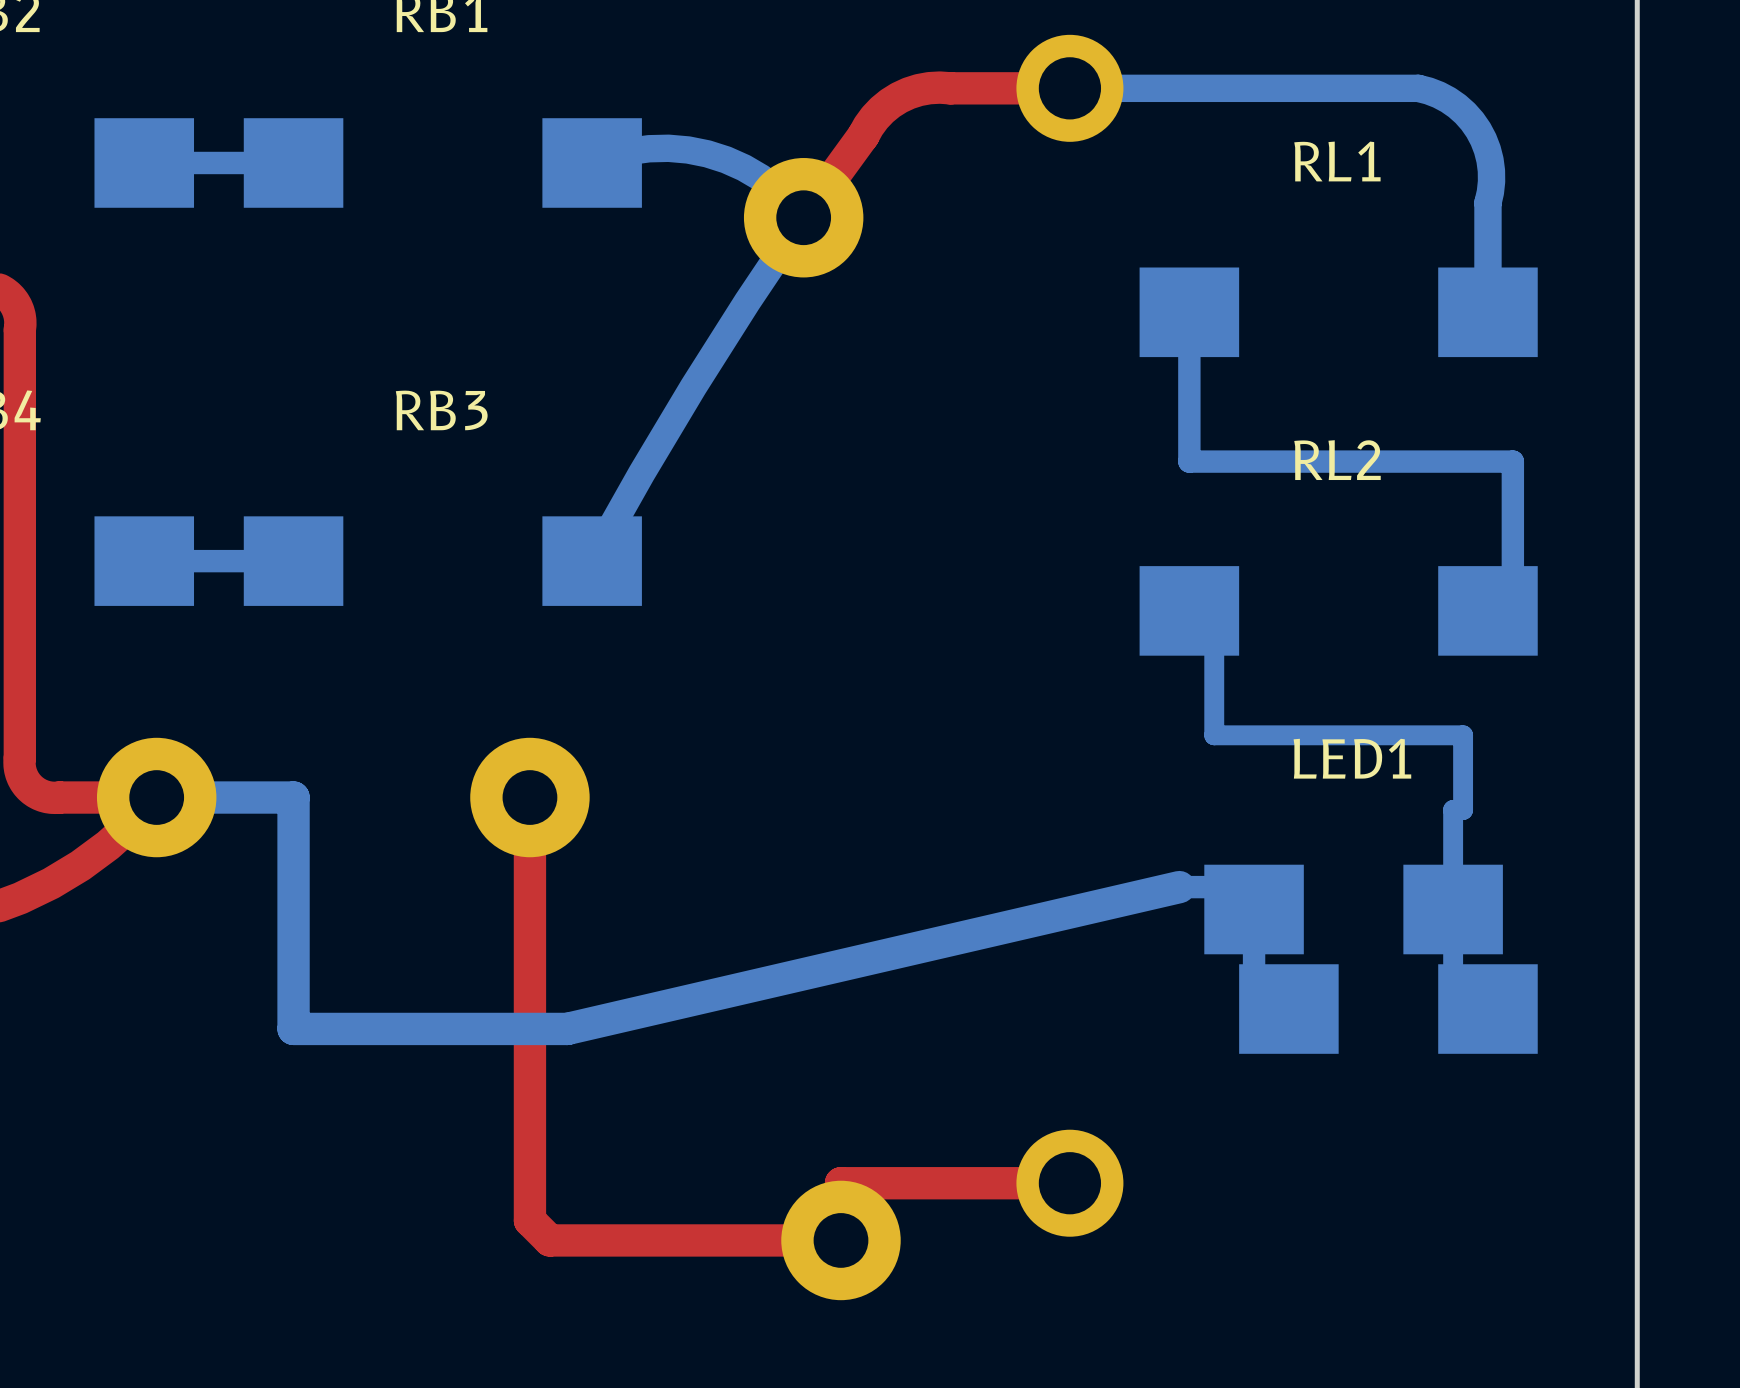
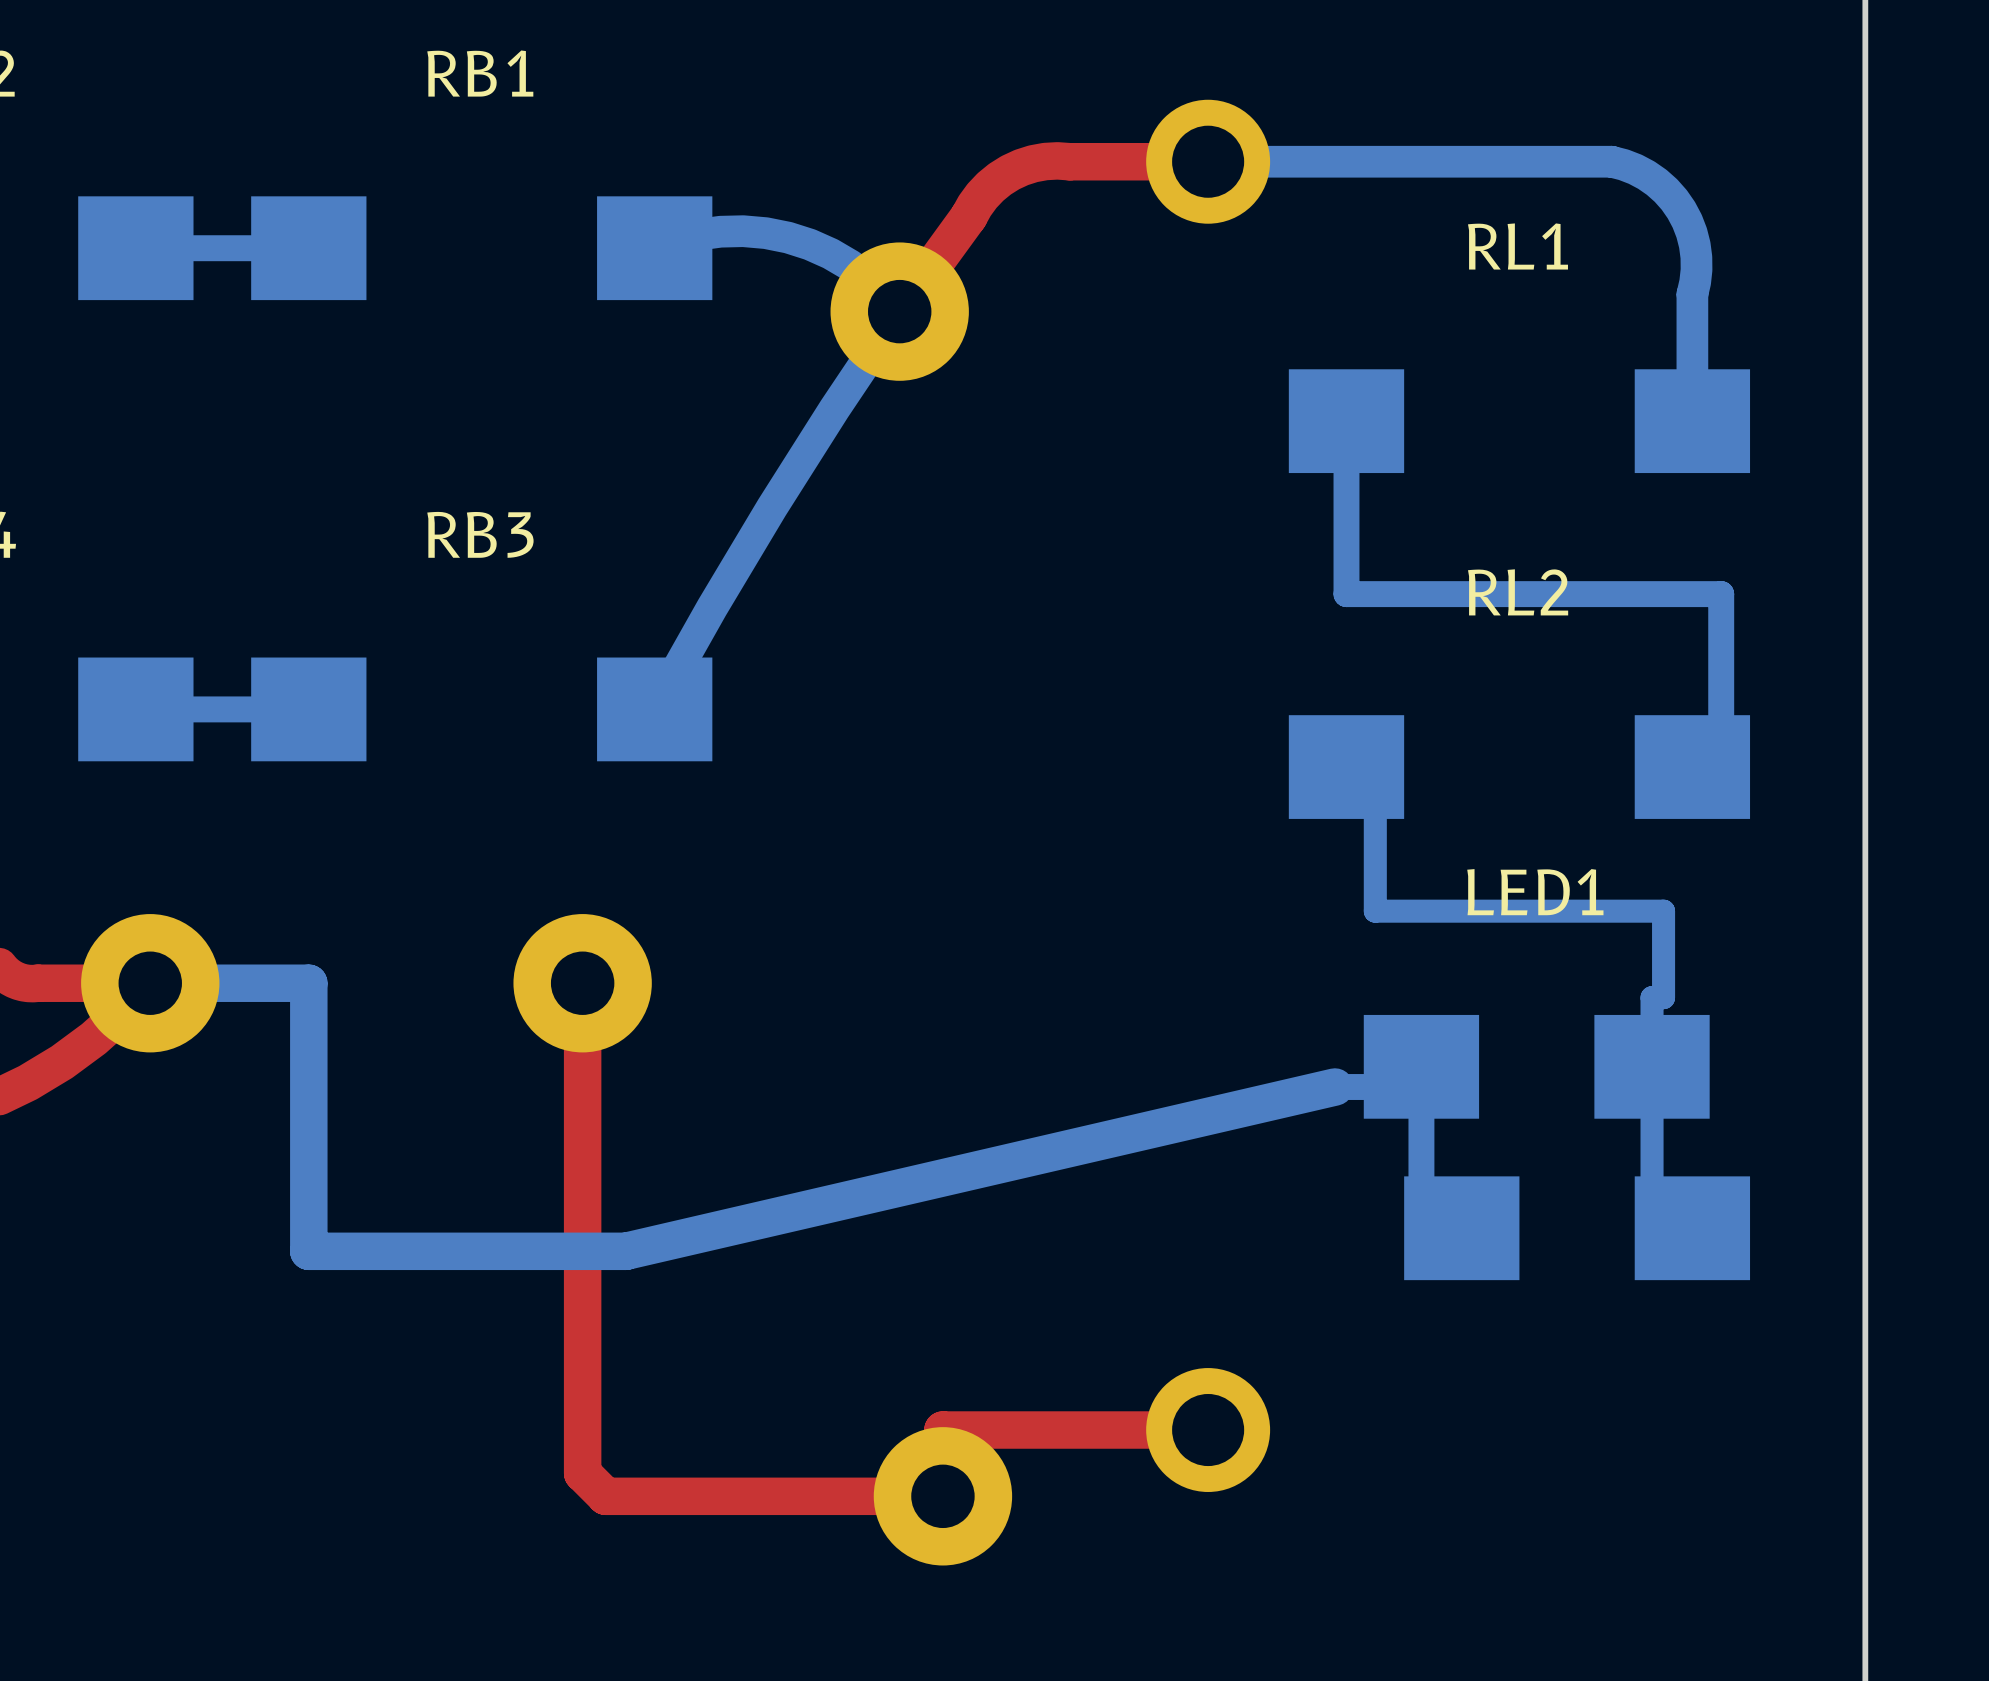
LED1 position: (1353, 909) -> (1536, 1066)

